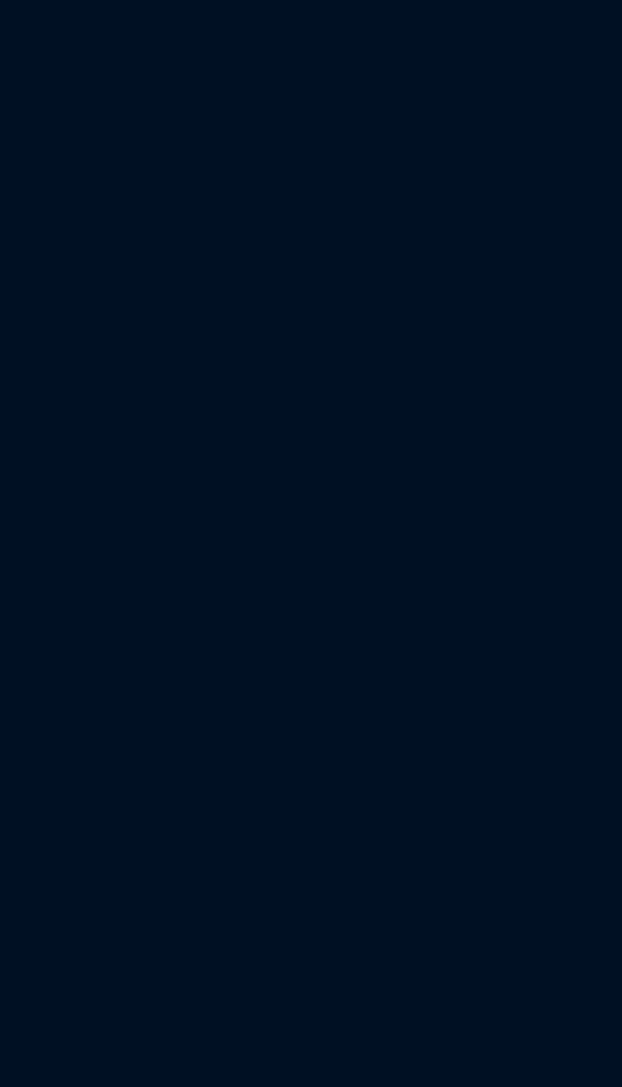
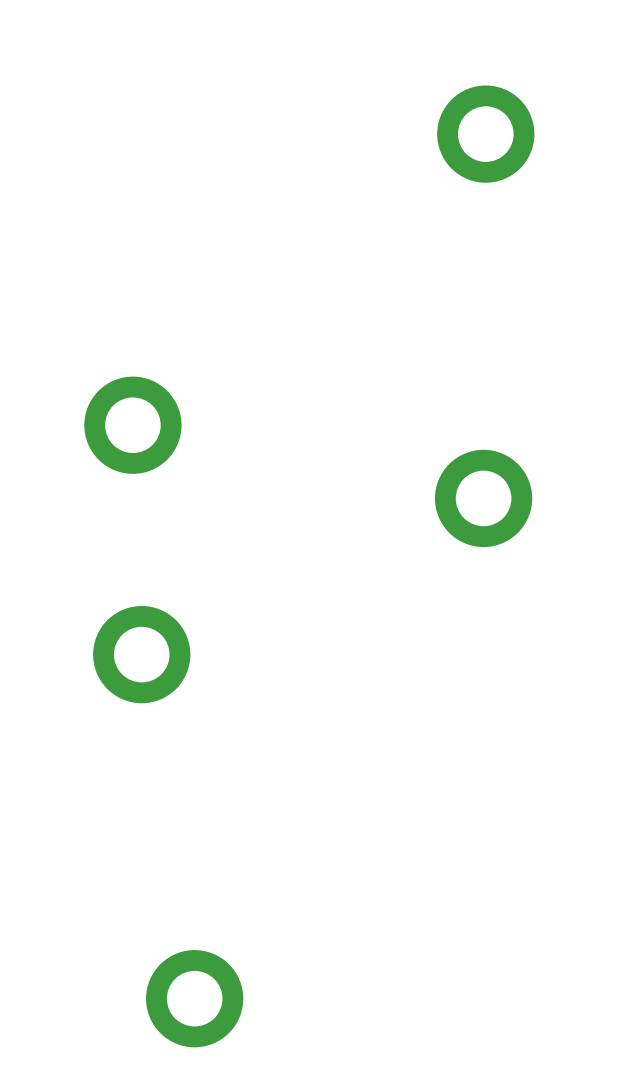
part: none -> (485, 134)
part: none -> (132, 425)
part: none -> (483, 498)
part: none -> (141, 654)
part: none -> (194, 998)

